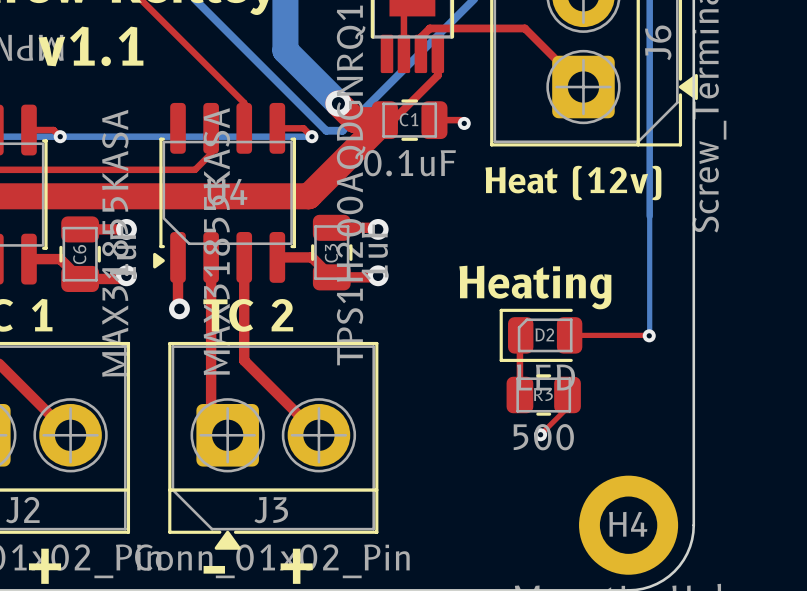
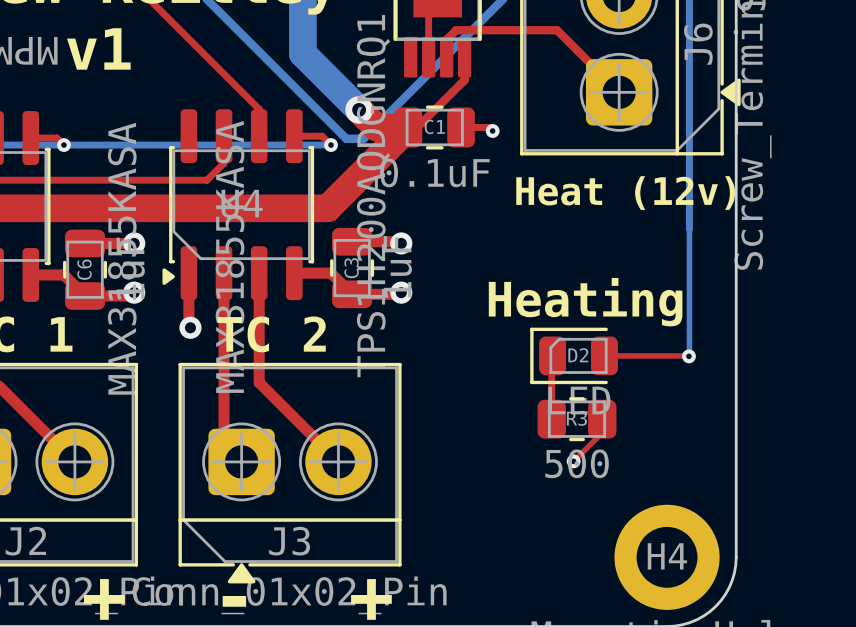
text: v1.1 (90, 46) -> v1 (98, 48)

